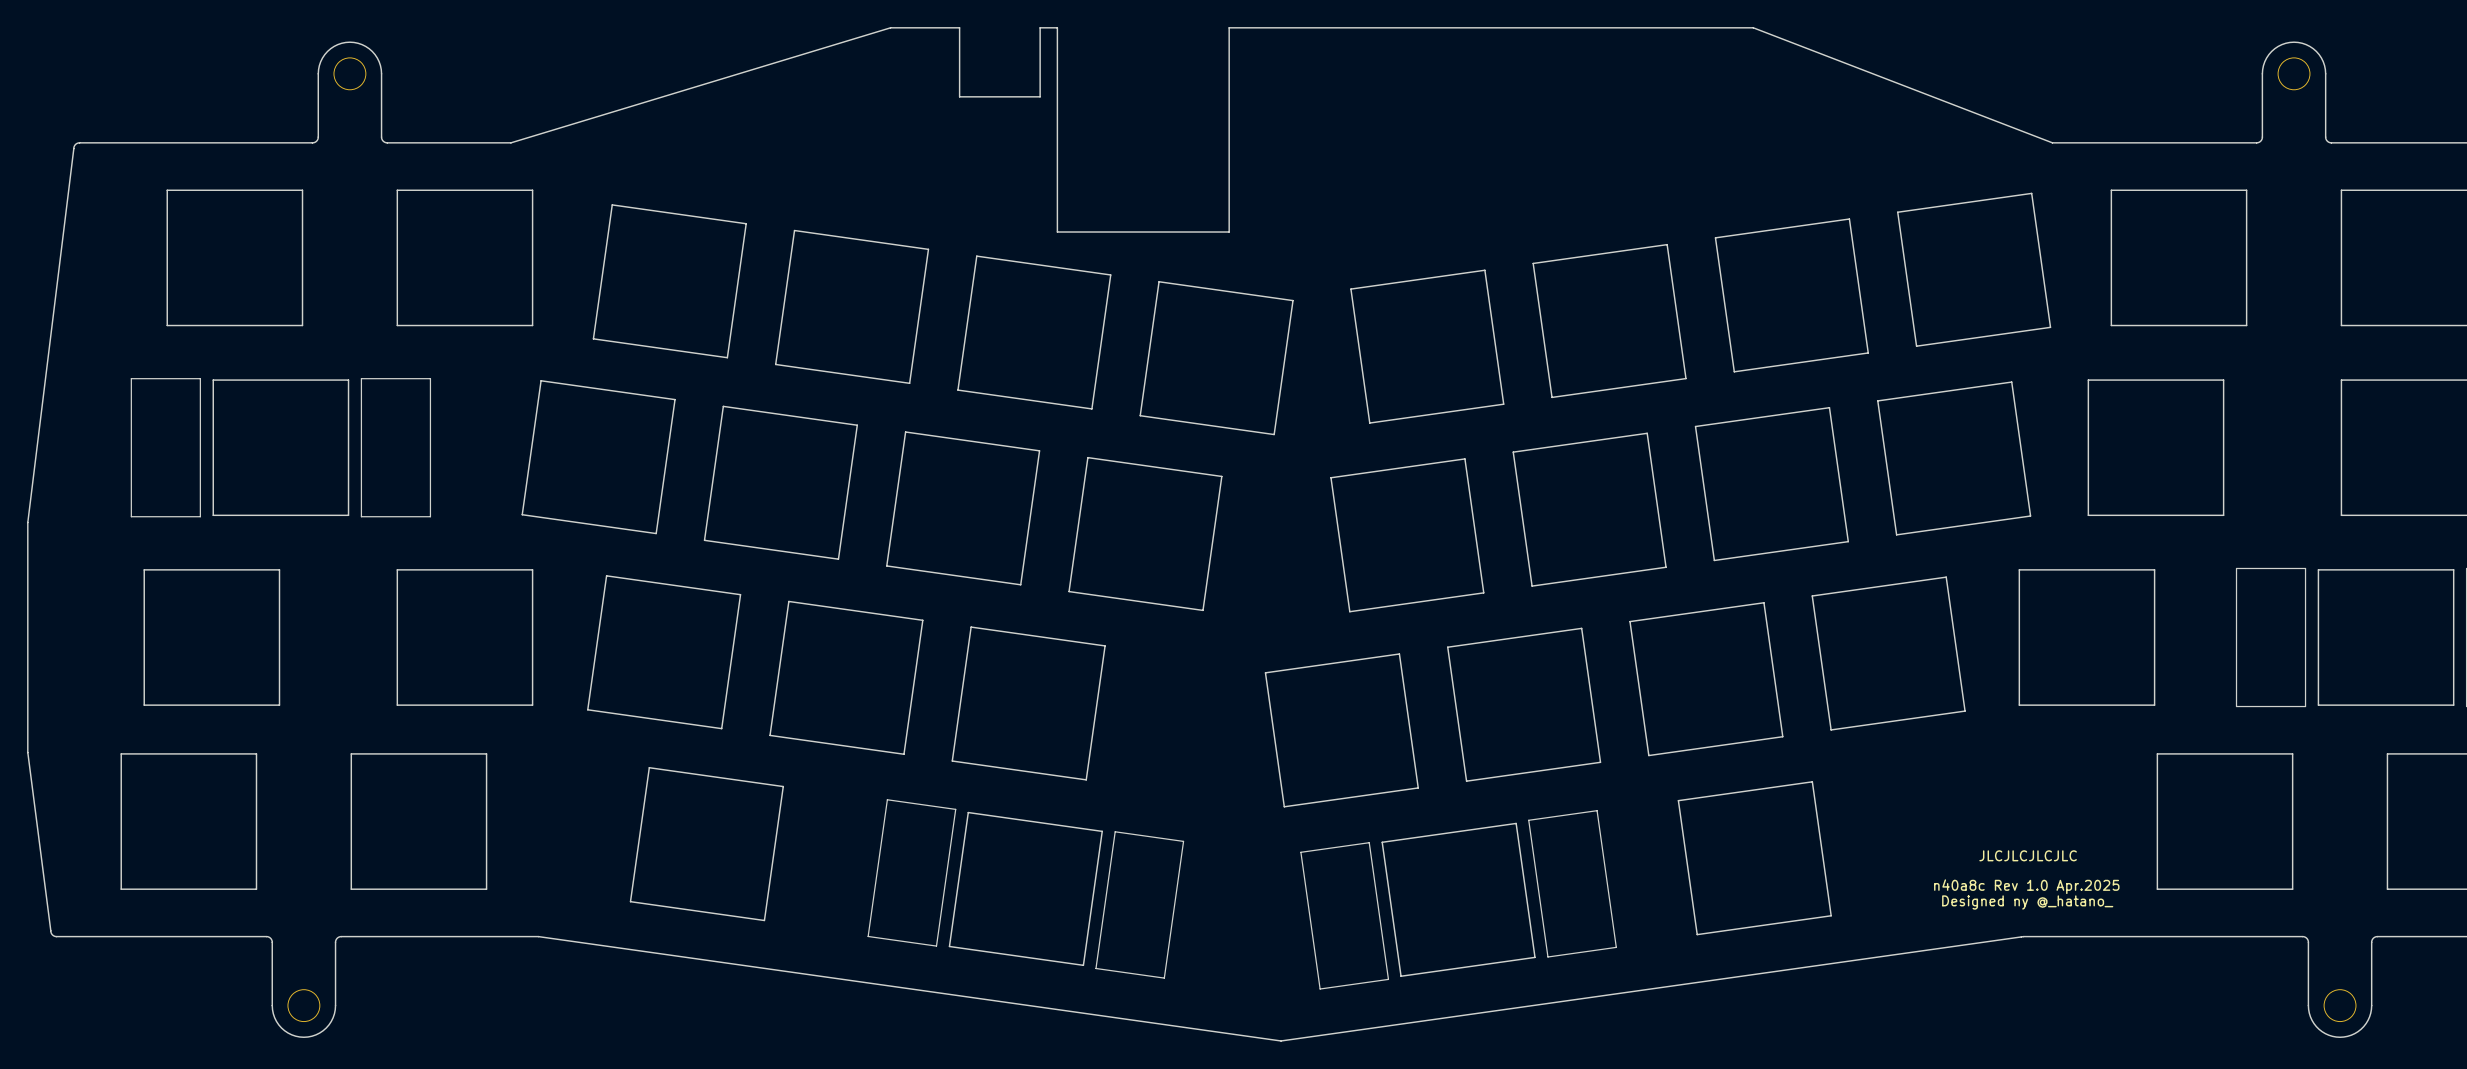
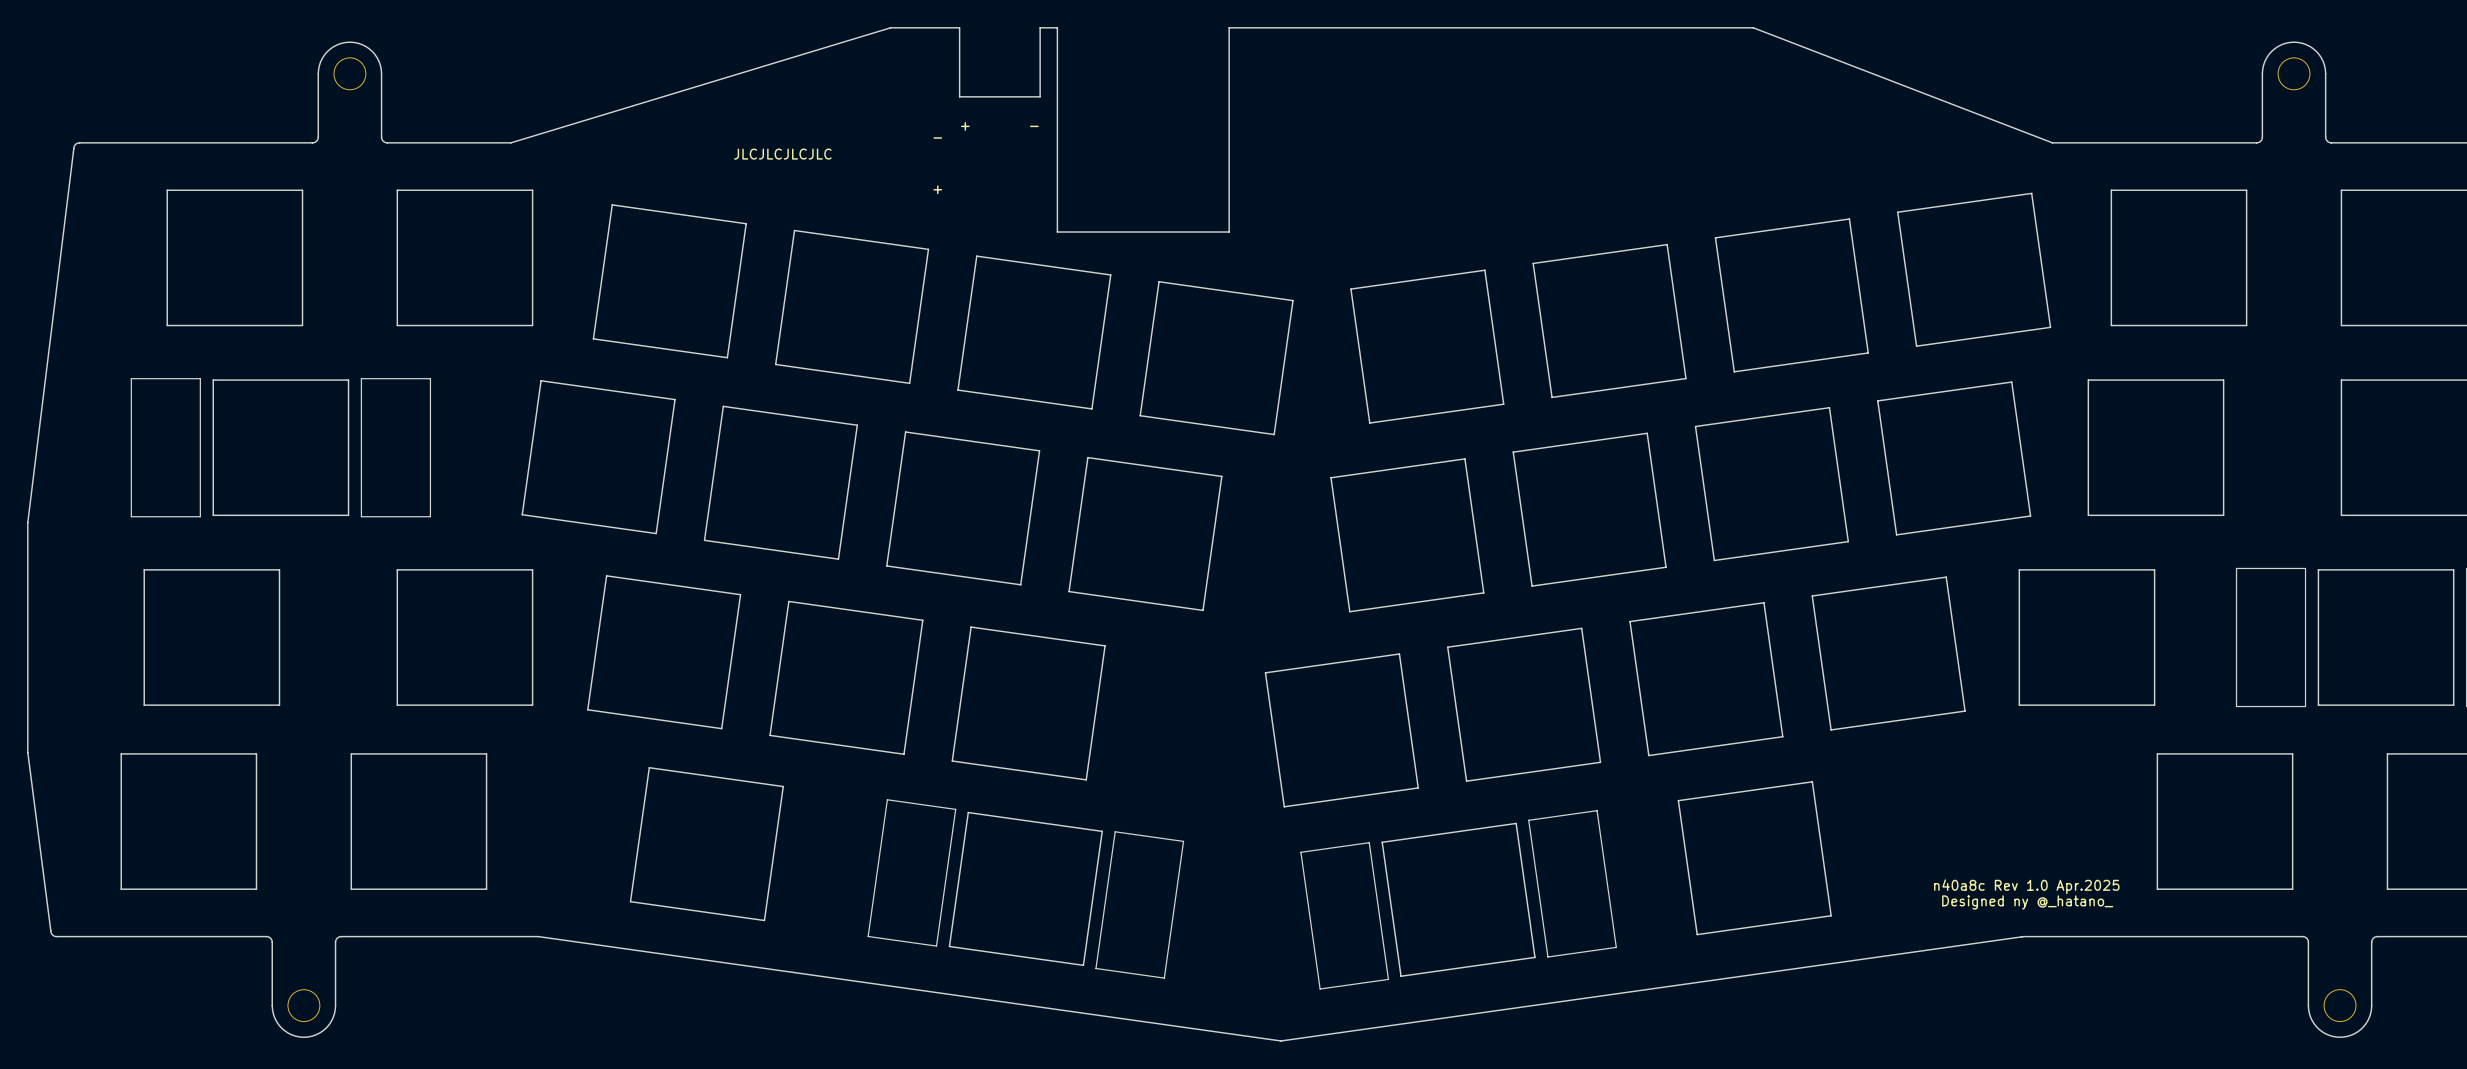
text: none -> + (965, 126)
text: none -> - (1034, 126)
text: none -> - (937, 137)
text: none -> JLCJLCJLCJLC (782, 154)
text: none -> + (937, 189)
text: JLCJLCJLCJLC (2028, 855) -> none

